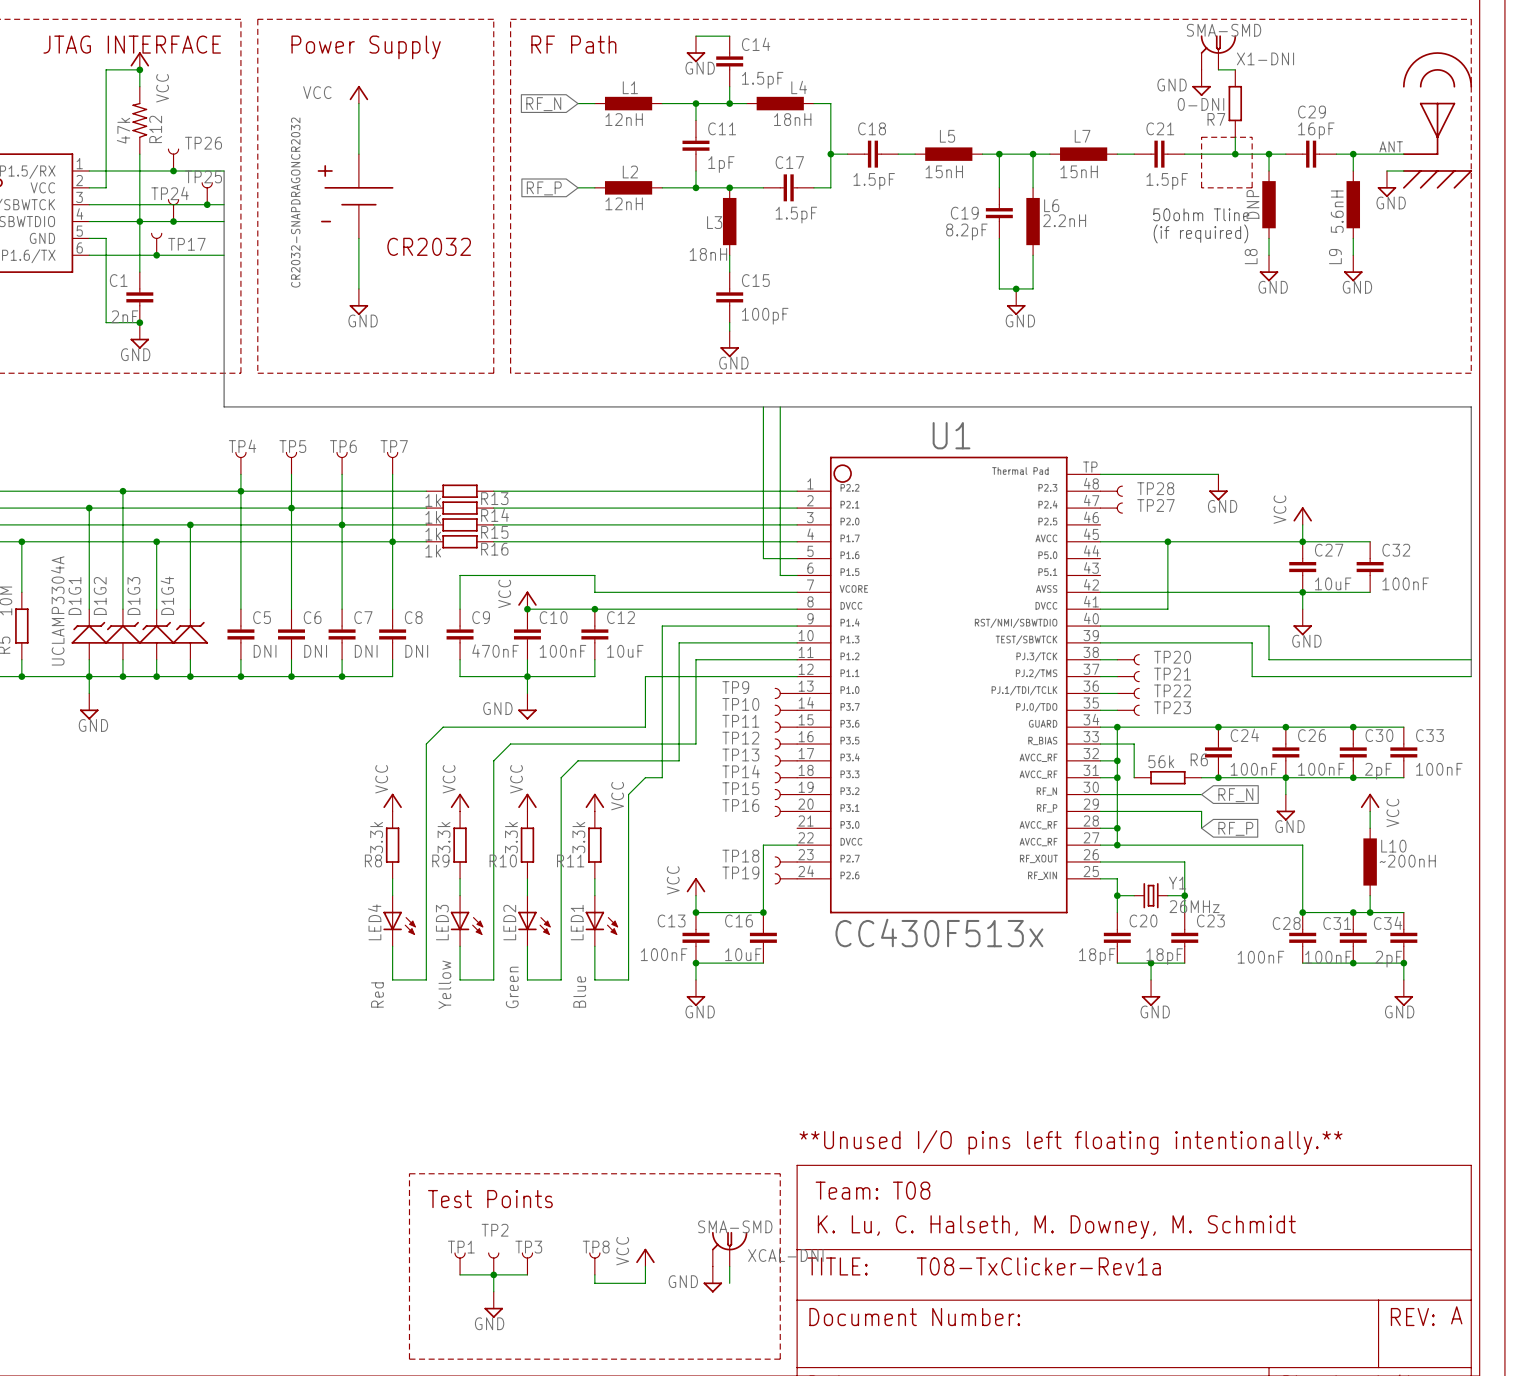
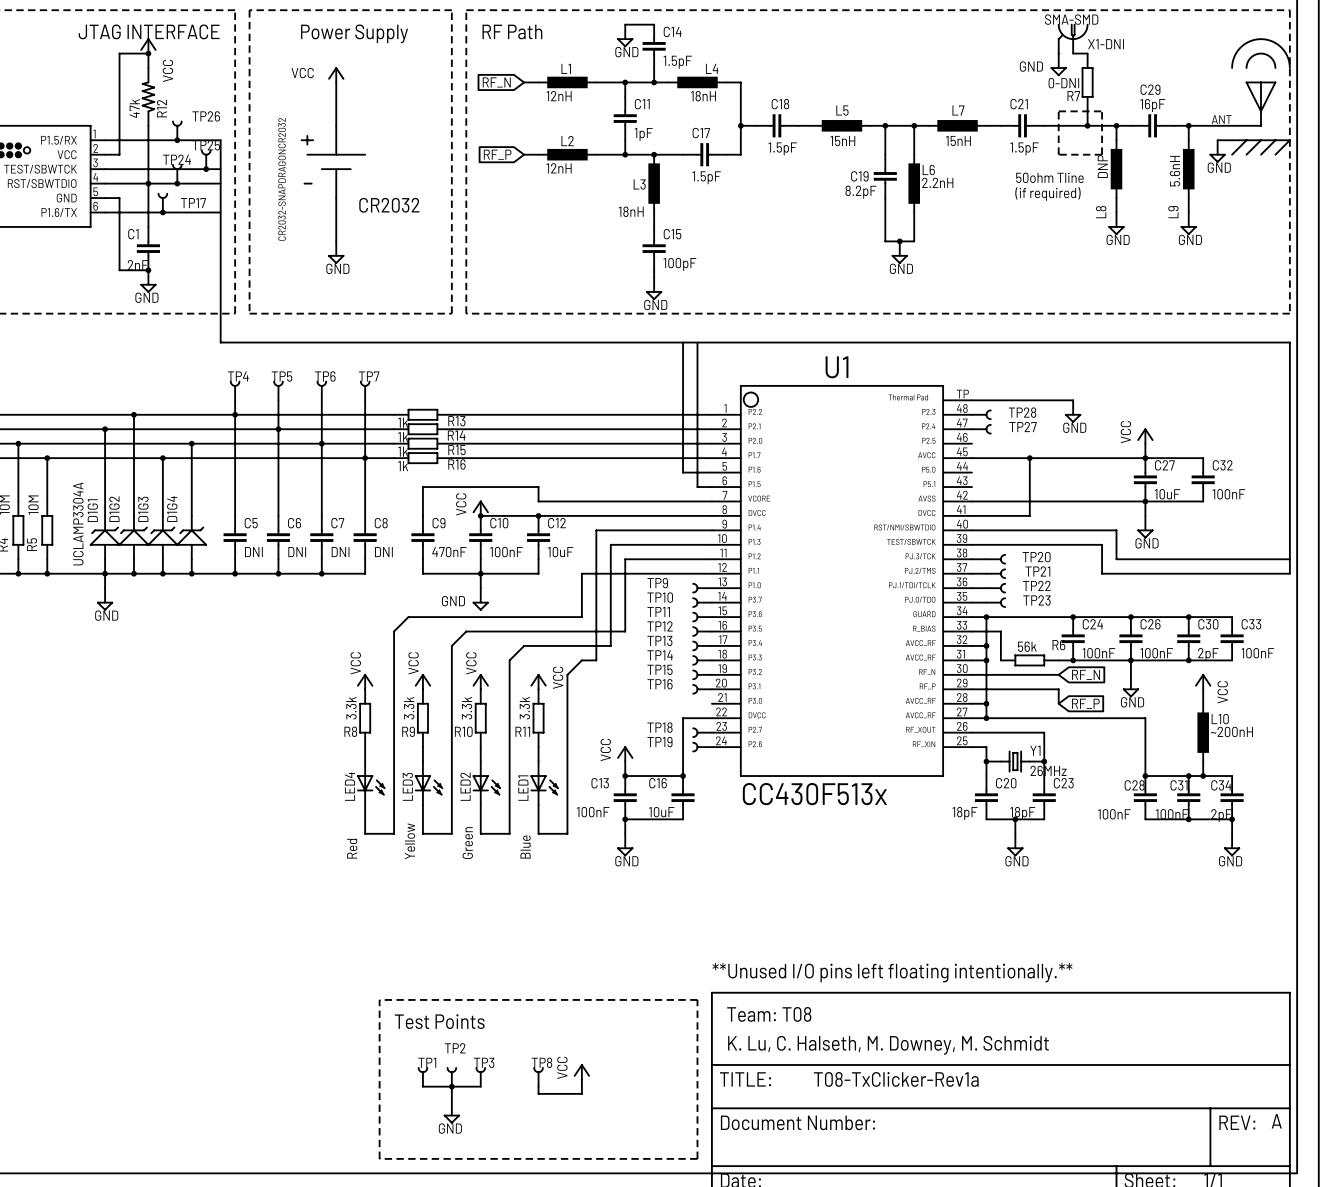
XCAL-DNI: SMA-SMD (729, 1249) -> none
wire: (729, 1266) (729, 1283) -> none
power symbol: GND (712, 1279) -> none

